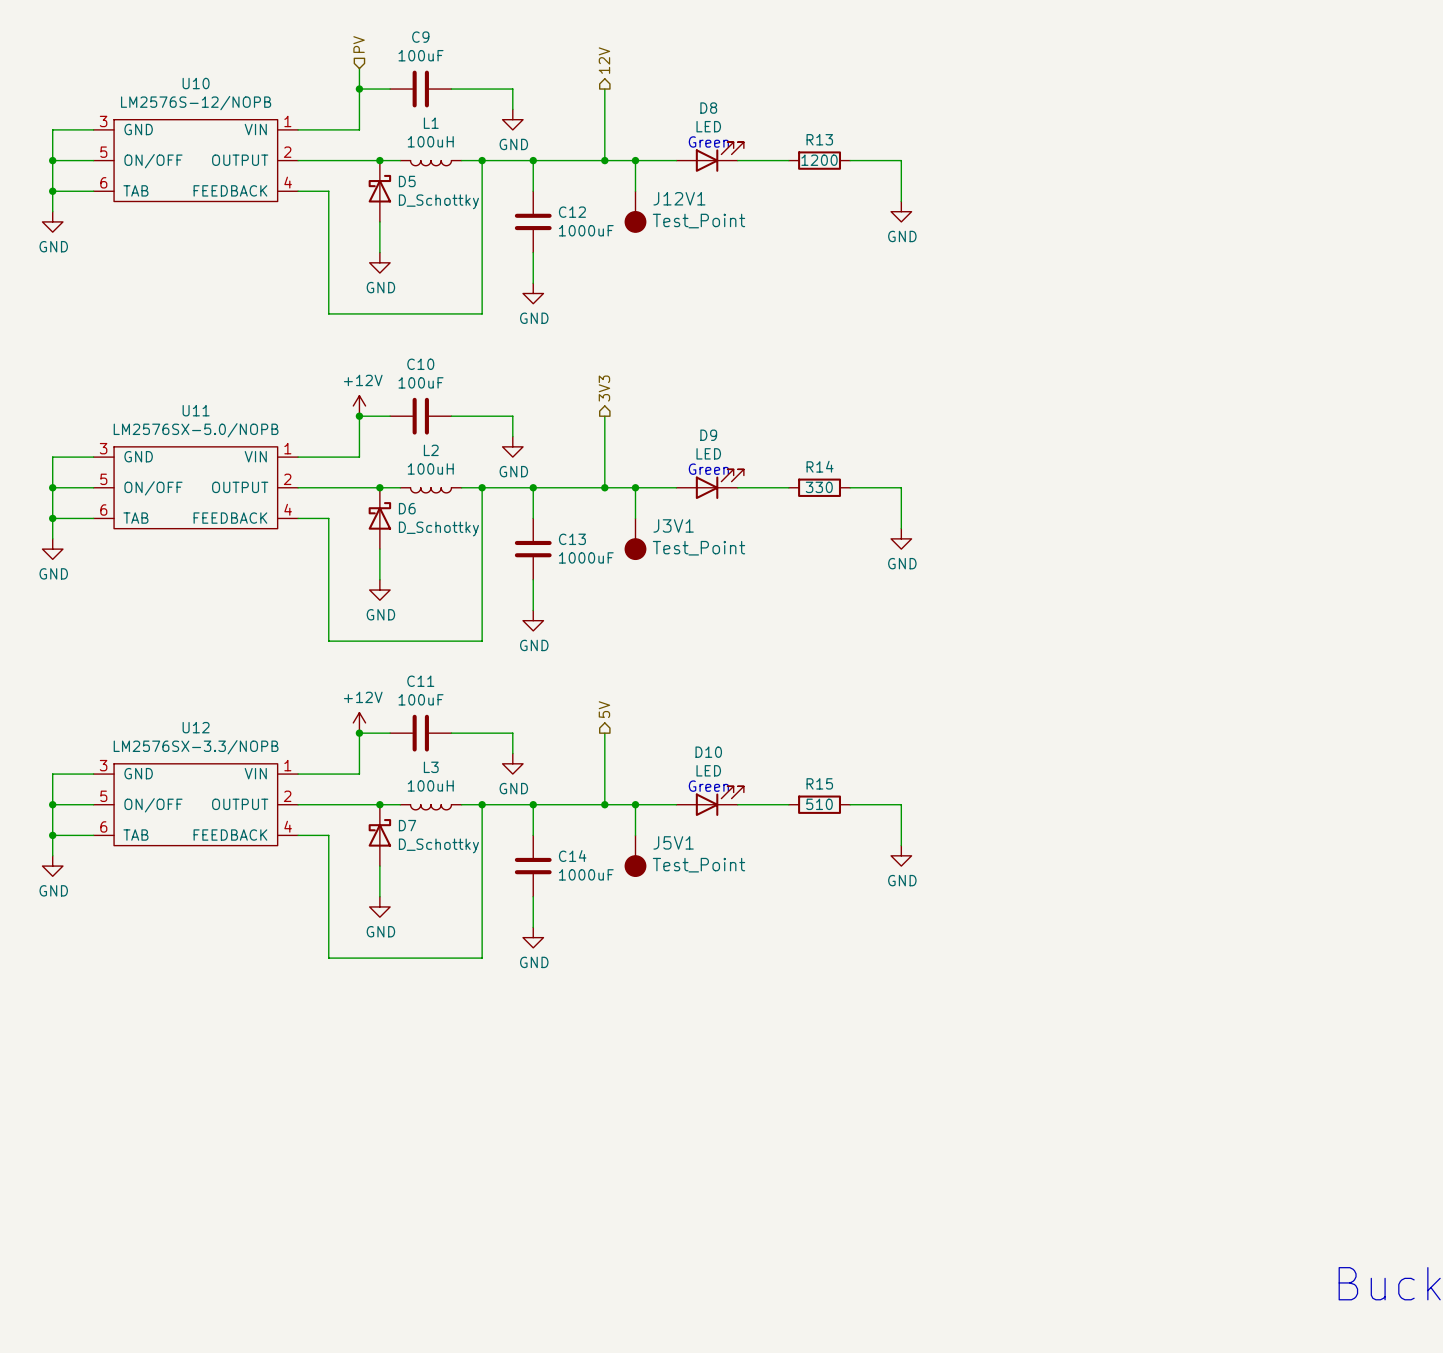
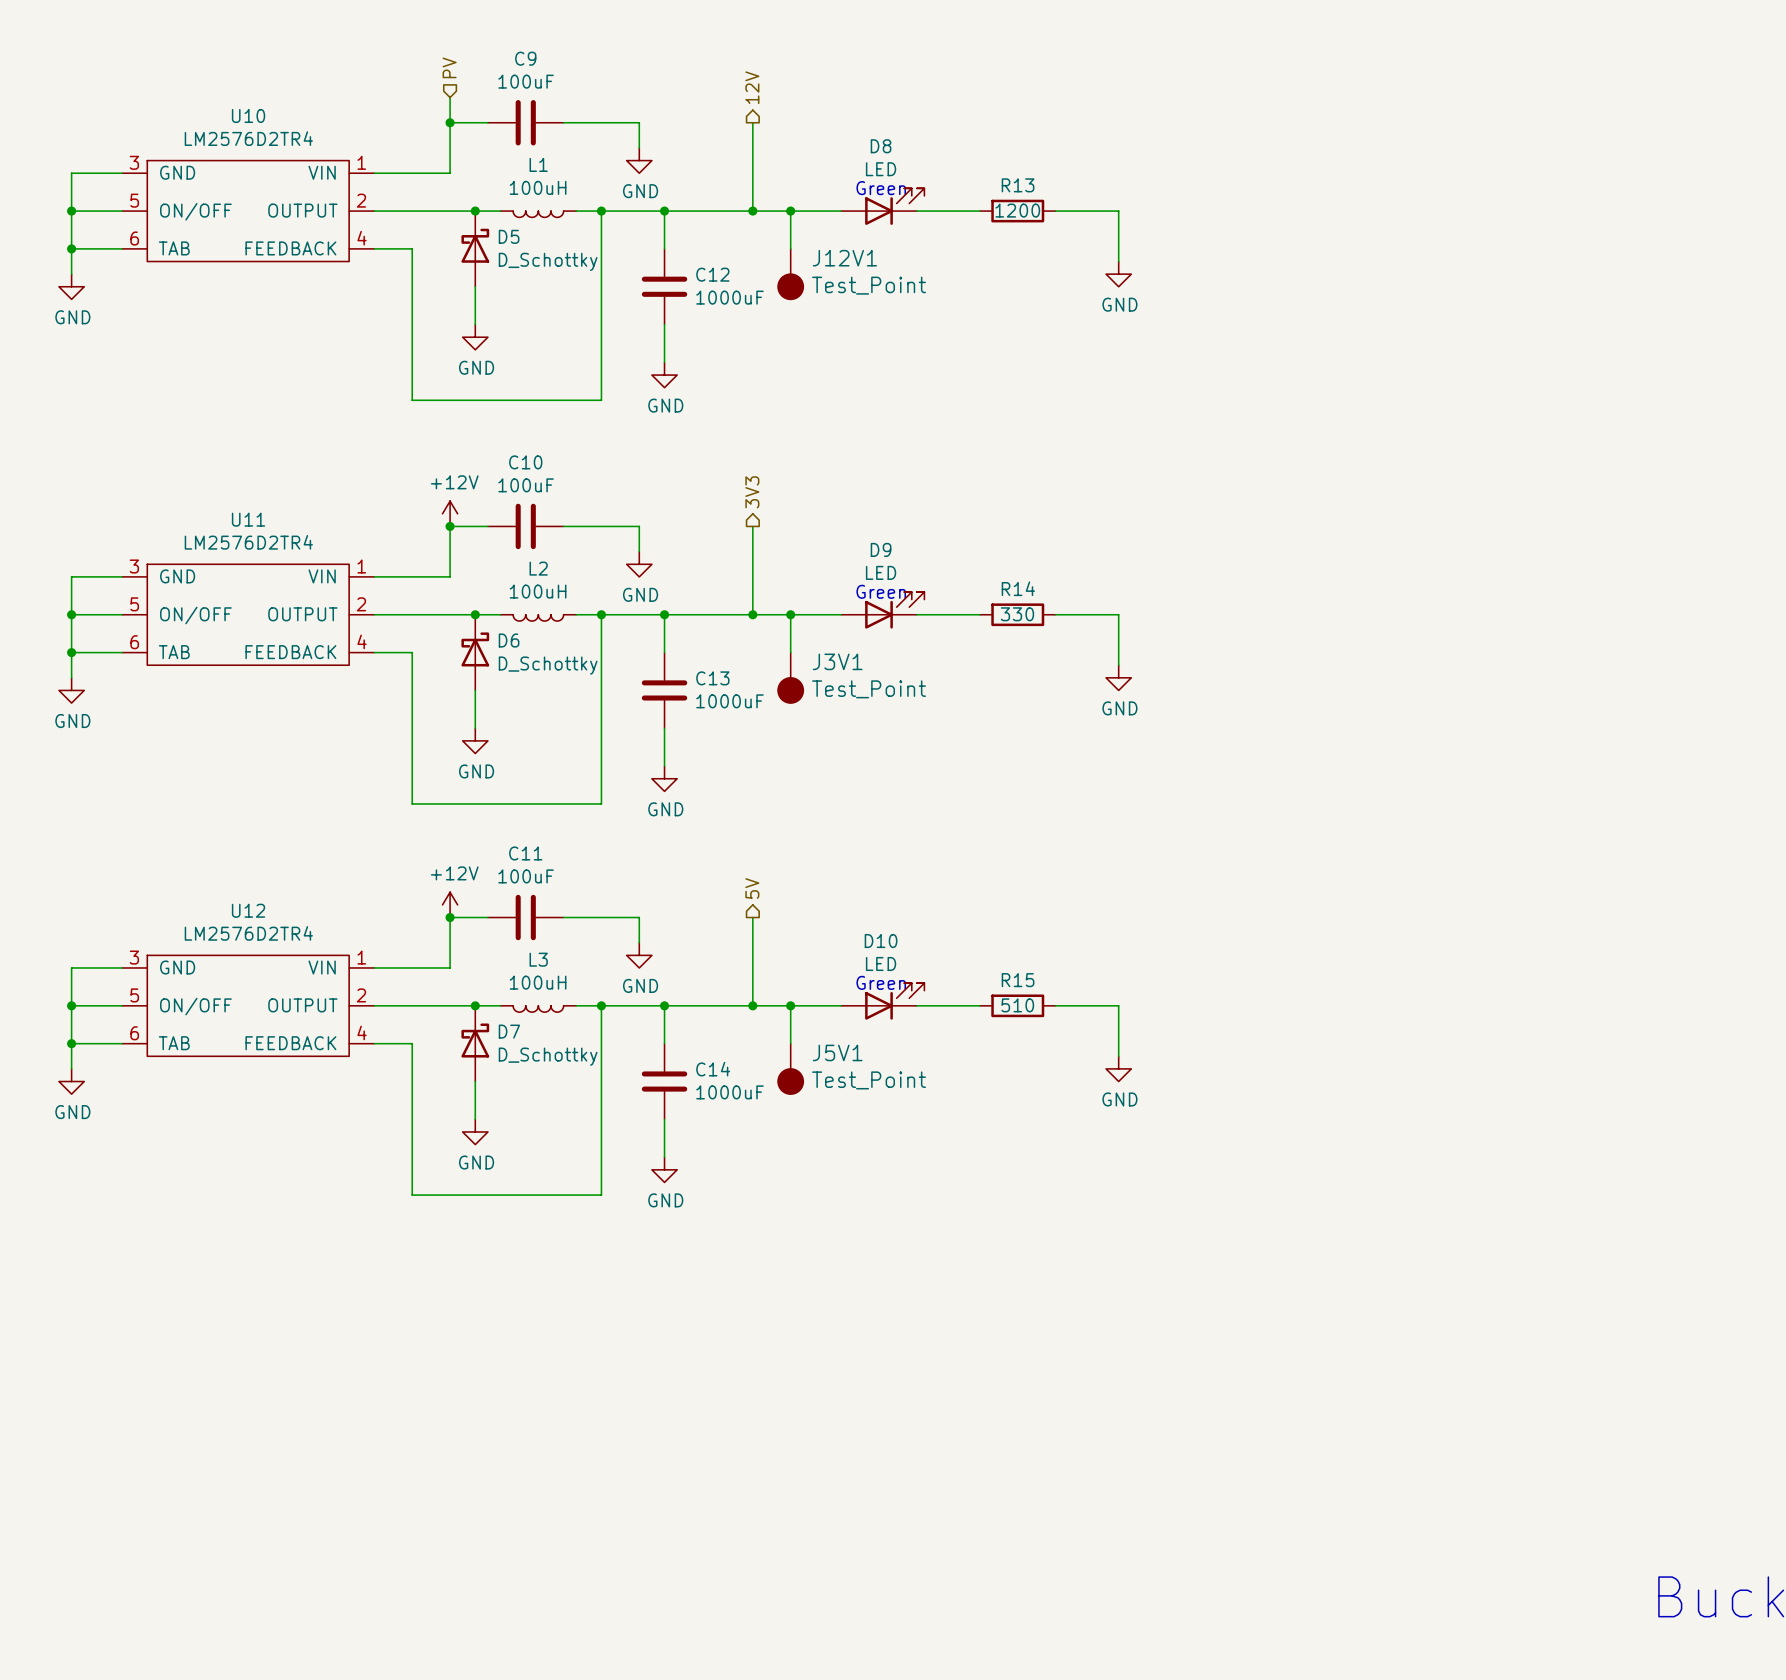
U10 value: LM2576S-12/NOPB (196, 103) -> LM2576D2TR4 (248, 138)
U11 value: LM2576SX-5.0/NOPB (196, 430) -> LM2576D2TR4 (248, 542)
U12 value: LM2576SX-3.3/NOPB (196, 747) -> LM2576D2TR4 (248, 933)

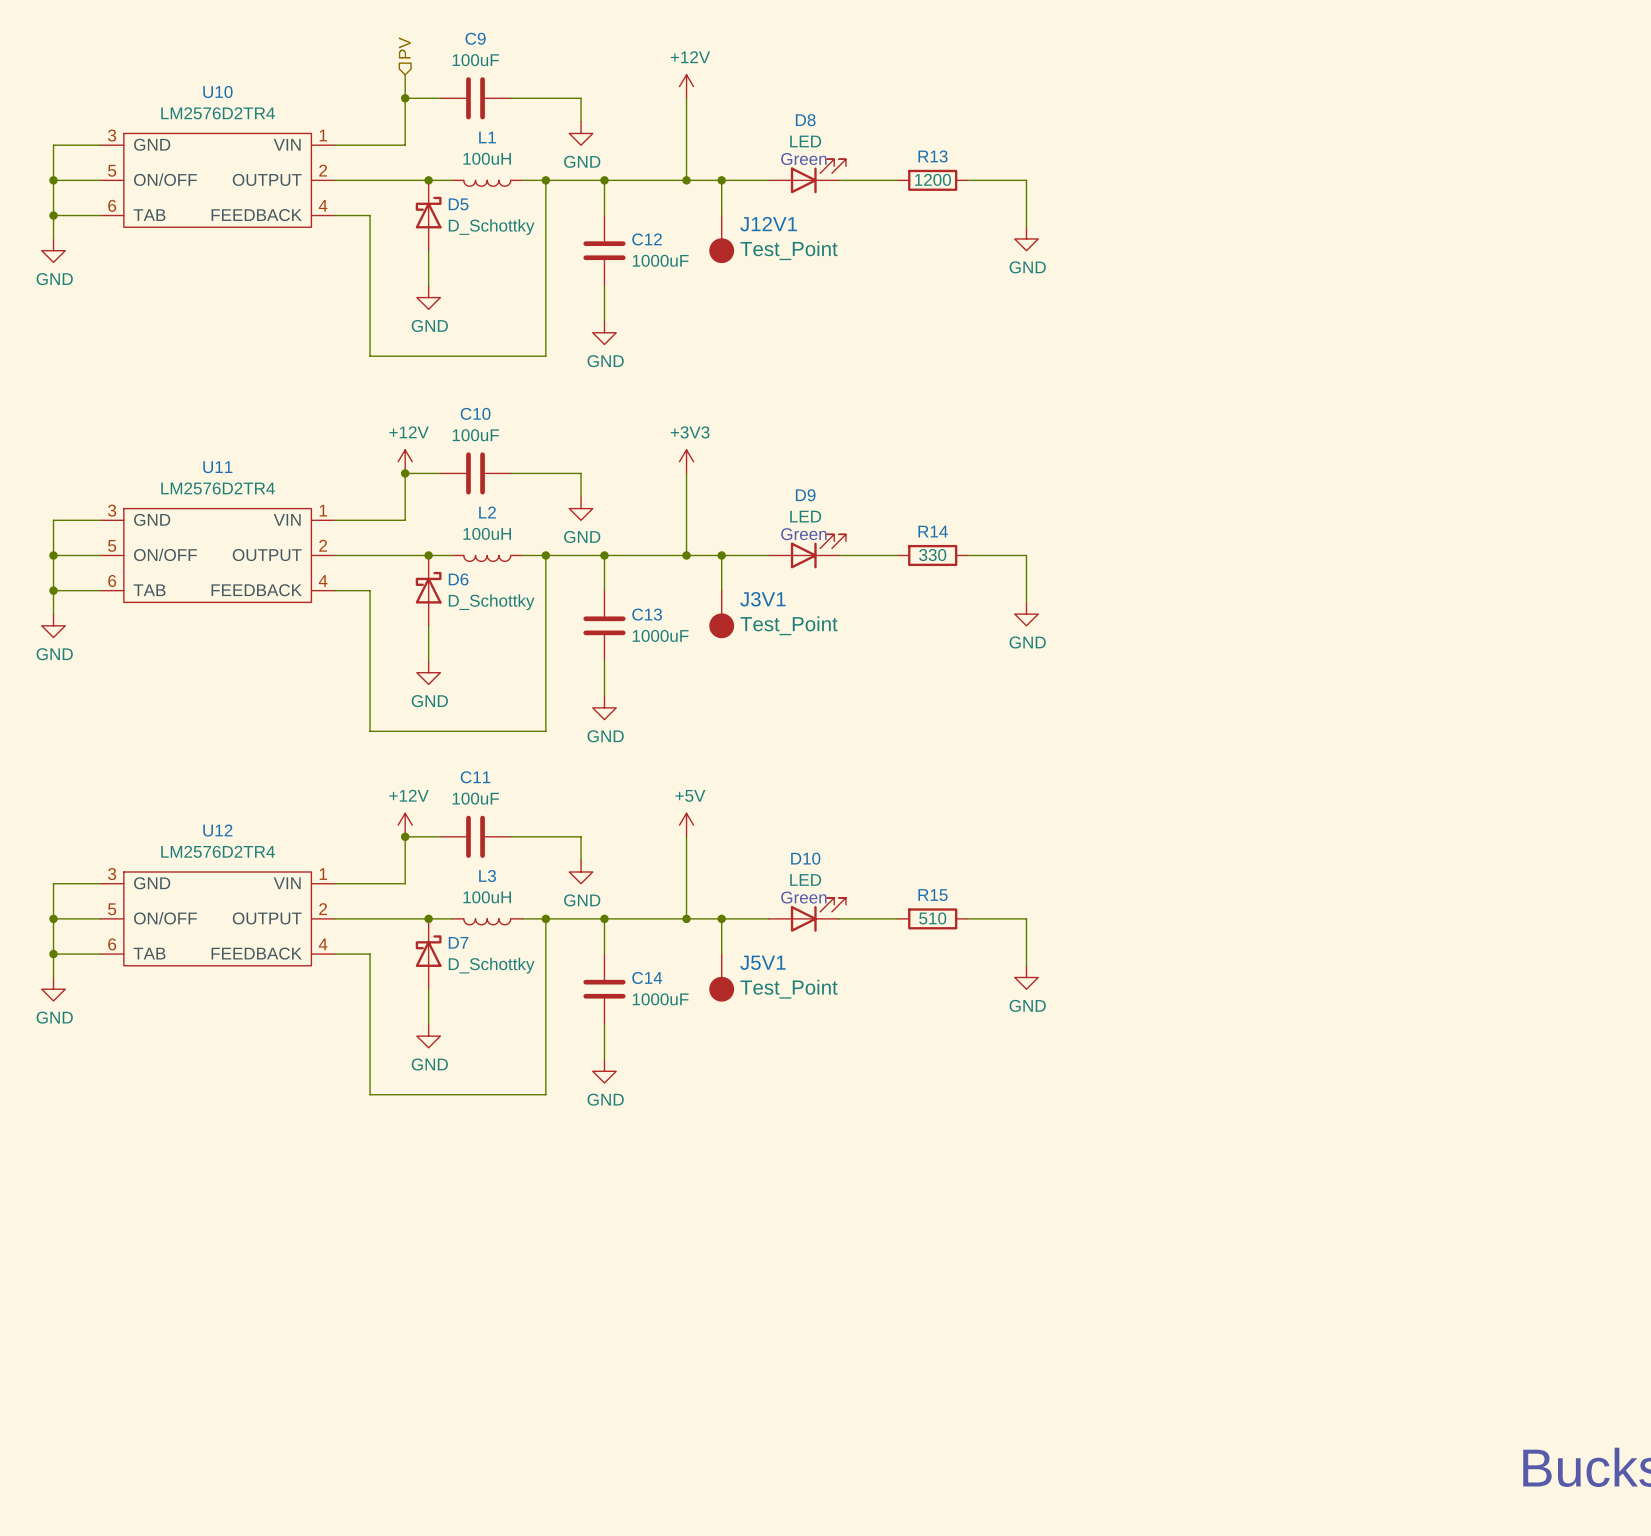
hierarchical label: 12V (752, 87) -> none
power symbol: none -> +12V (686, 86)
hierarchical label: 3V3 (752, 492) -> none
power symbol: none -> +3V3 (686, 461)
hierarchical label: 5V (752, 888) -> none
power symbol: none -> +5V (686, 825)

